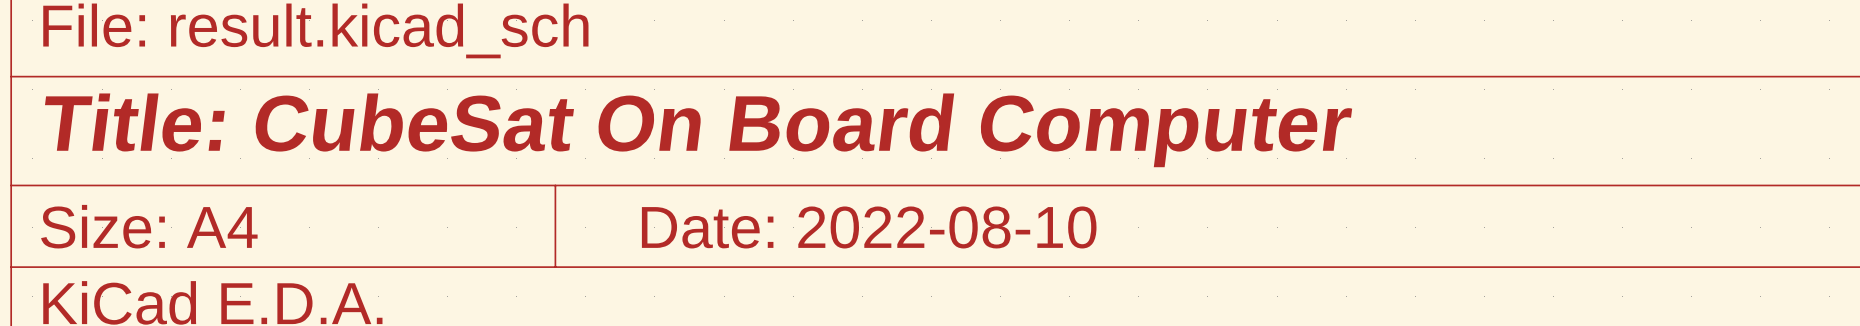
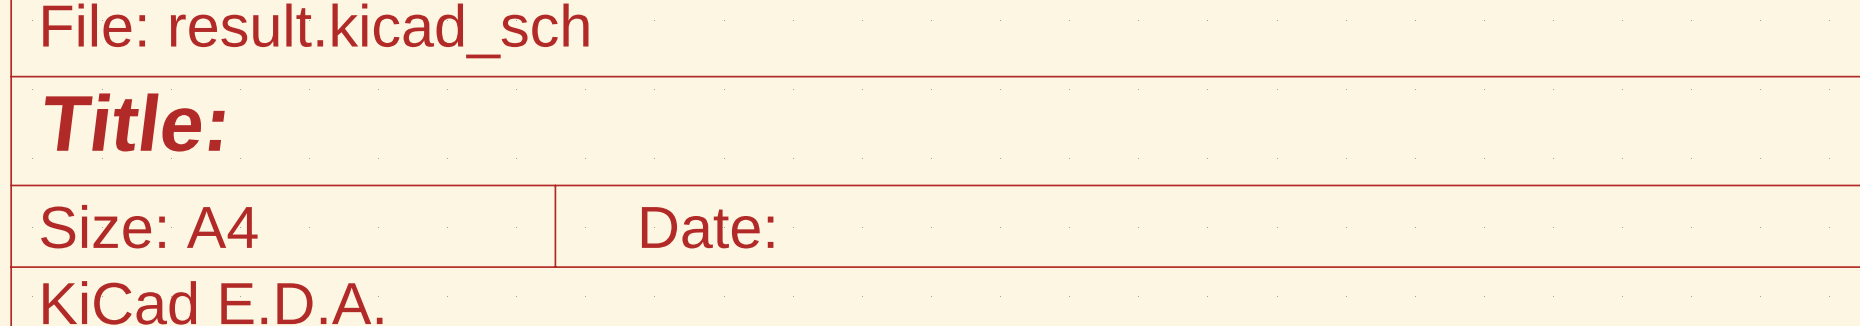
title block: Title: CubeSat On Board Computer (698, 130) -> Title: (134, 122)
title block: Date: 2022-08-10 (869, 227) -> Date: (707, 227)

